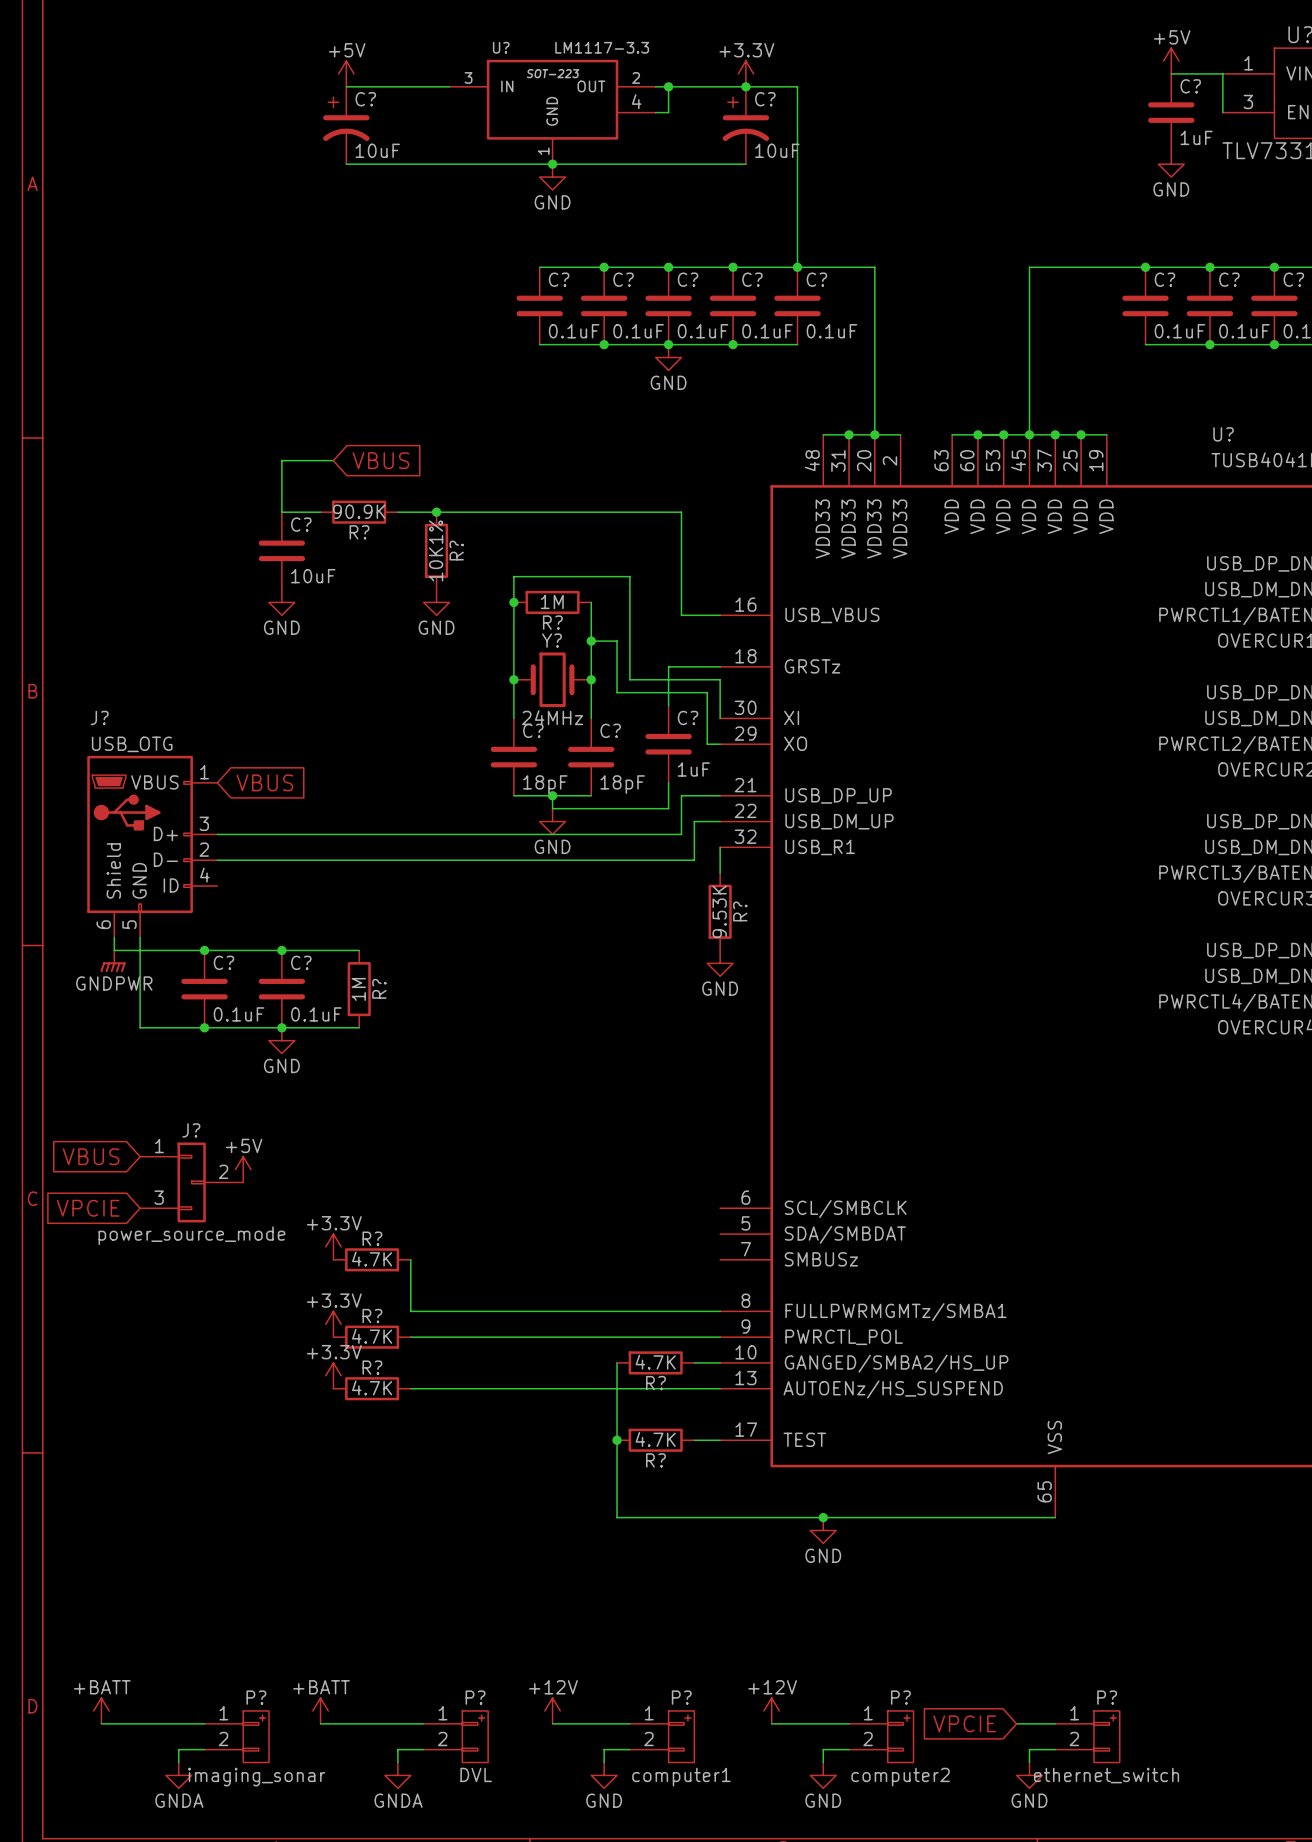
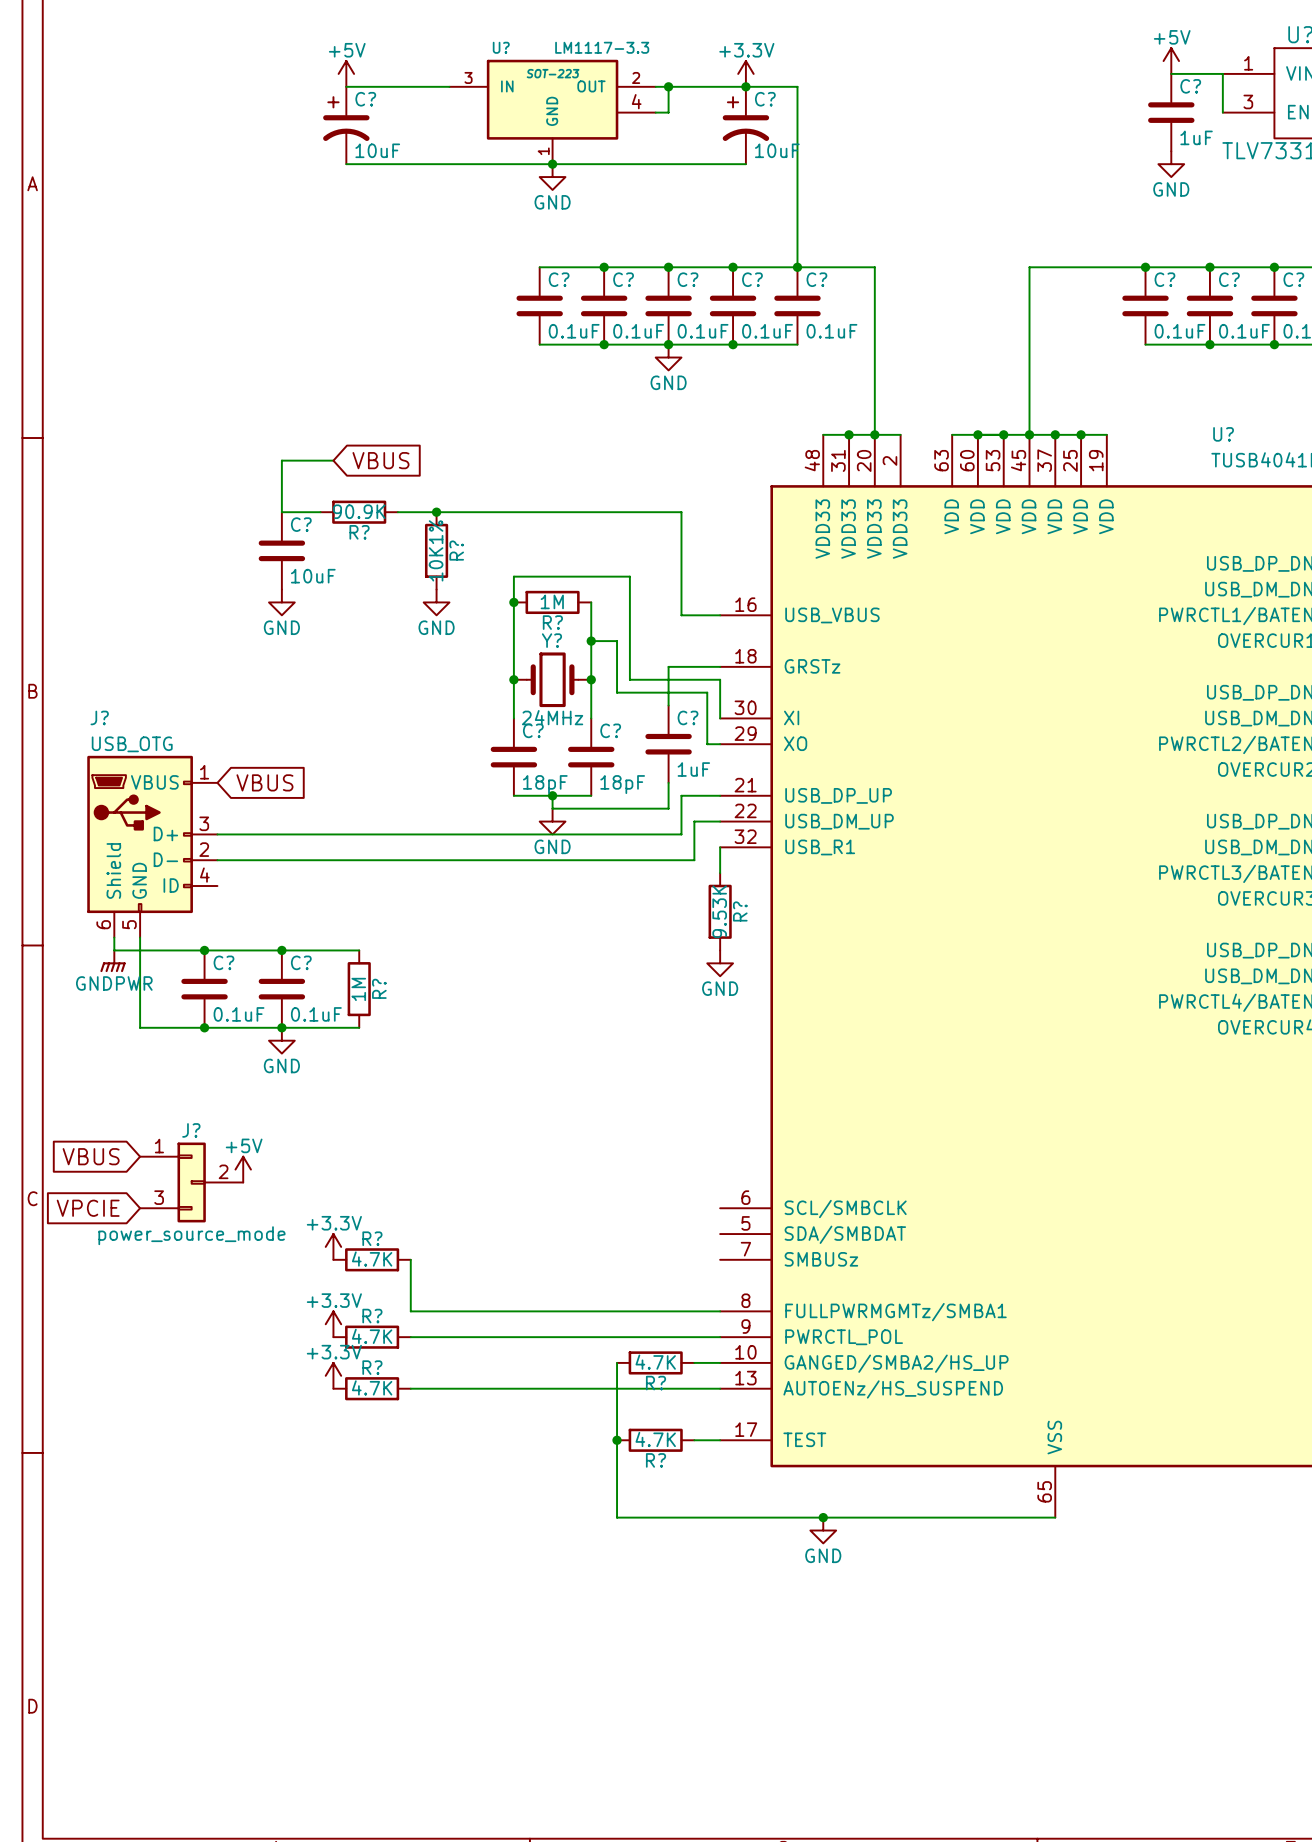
power symbol: +BATT (101, 1710) -> none
power symbol: +BATT (320, 1710) -> none
power symbol: +12V (552, 1710) -> none
power symbol: +12V (771, 1710) -> none
wire: (101, 1723) (204, 1723) -> none
wire: (320, 1723) (423, 1723) -> none
wire: (552, 1723) (629, 1723) -> none
wire: (771, 1723) (849, 1723) -> none
global label: VPCIE (964, 1723) -> none
wire: (1016, 1723) (1055, 1723) -> none
P?: imaging_sonar (236, 1736) -> none
P?: DVL (455, 1736) -> none
P?: computer1 (662, 1736) -> none
P?: computer2 (881, 1736) -> none
P?: ethernet_switch (1087, 1736) -> none
wire: (204, 1749) (178, 1749) (178, 1762) -> none
wire: (423, 1749) (397, 1749) (397, 1762) -> none
wire: (629, 1749) (604, 1749) (604, 1762) -> none
wire: (849, 1749) (823, 1749) (823, 1762) -> none
wire: (1055, 1749) (1029, 1749) (1029, 1762) -> none
power symbol: GNDA (178, 1775) -> none
power symbol: GNDA (397, 1775) -> none
power symbol: GND (604, 1775) -> none
power symbol: GND (823, 1775) -> none
power symbol: GND (1029, 1775) -> none

